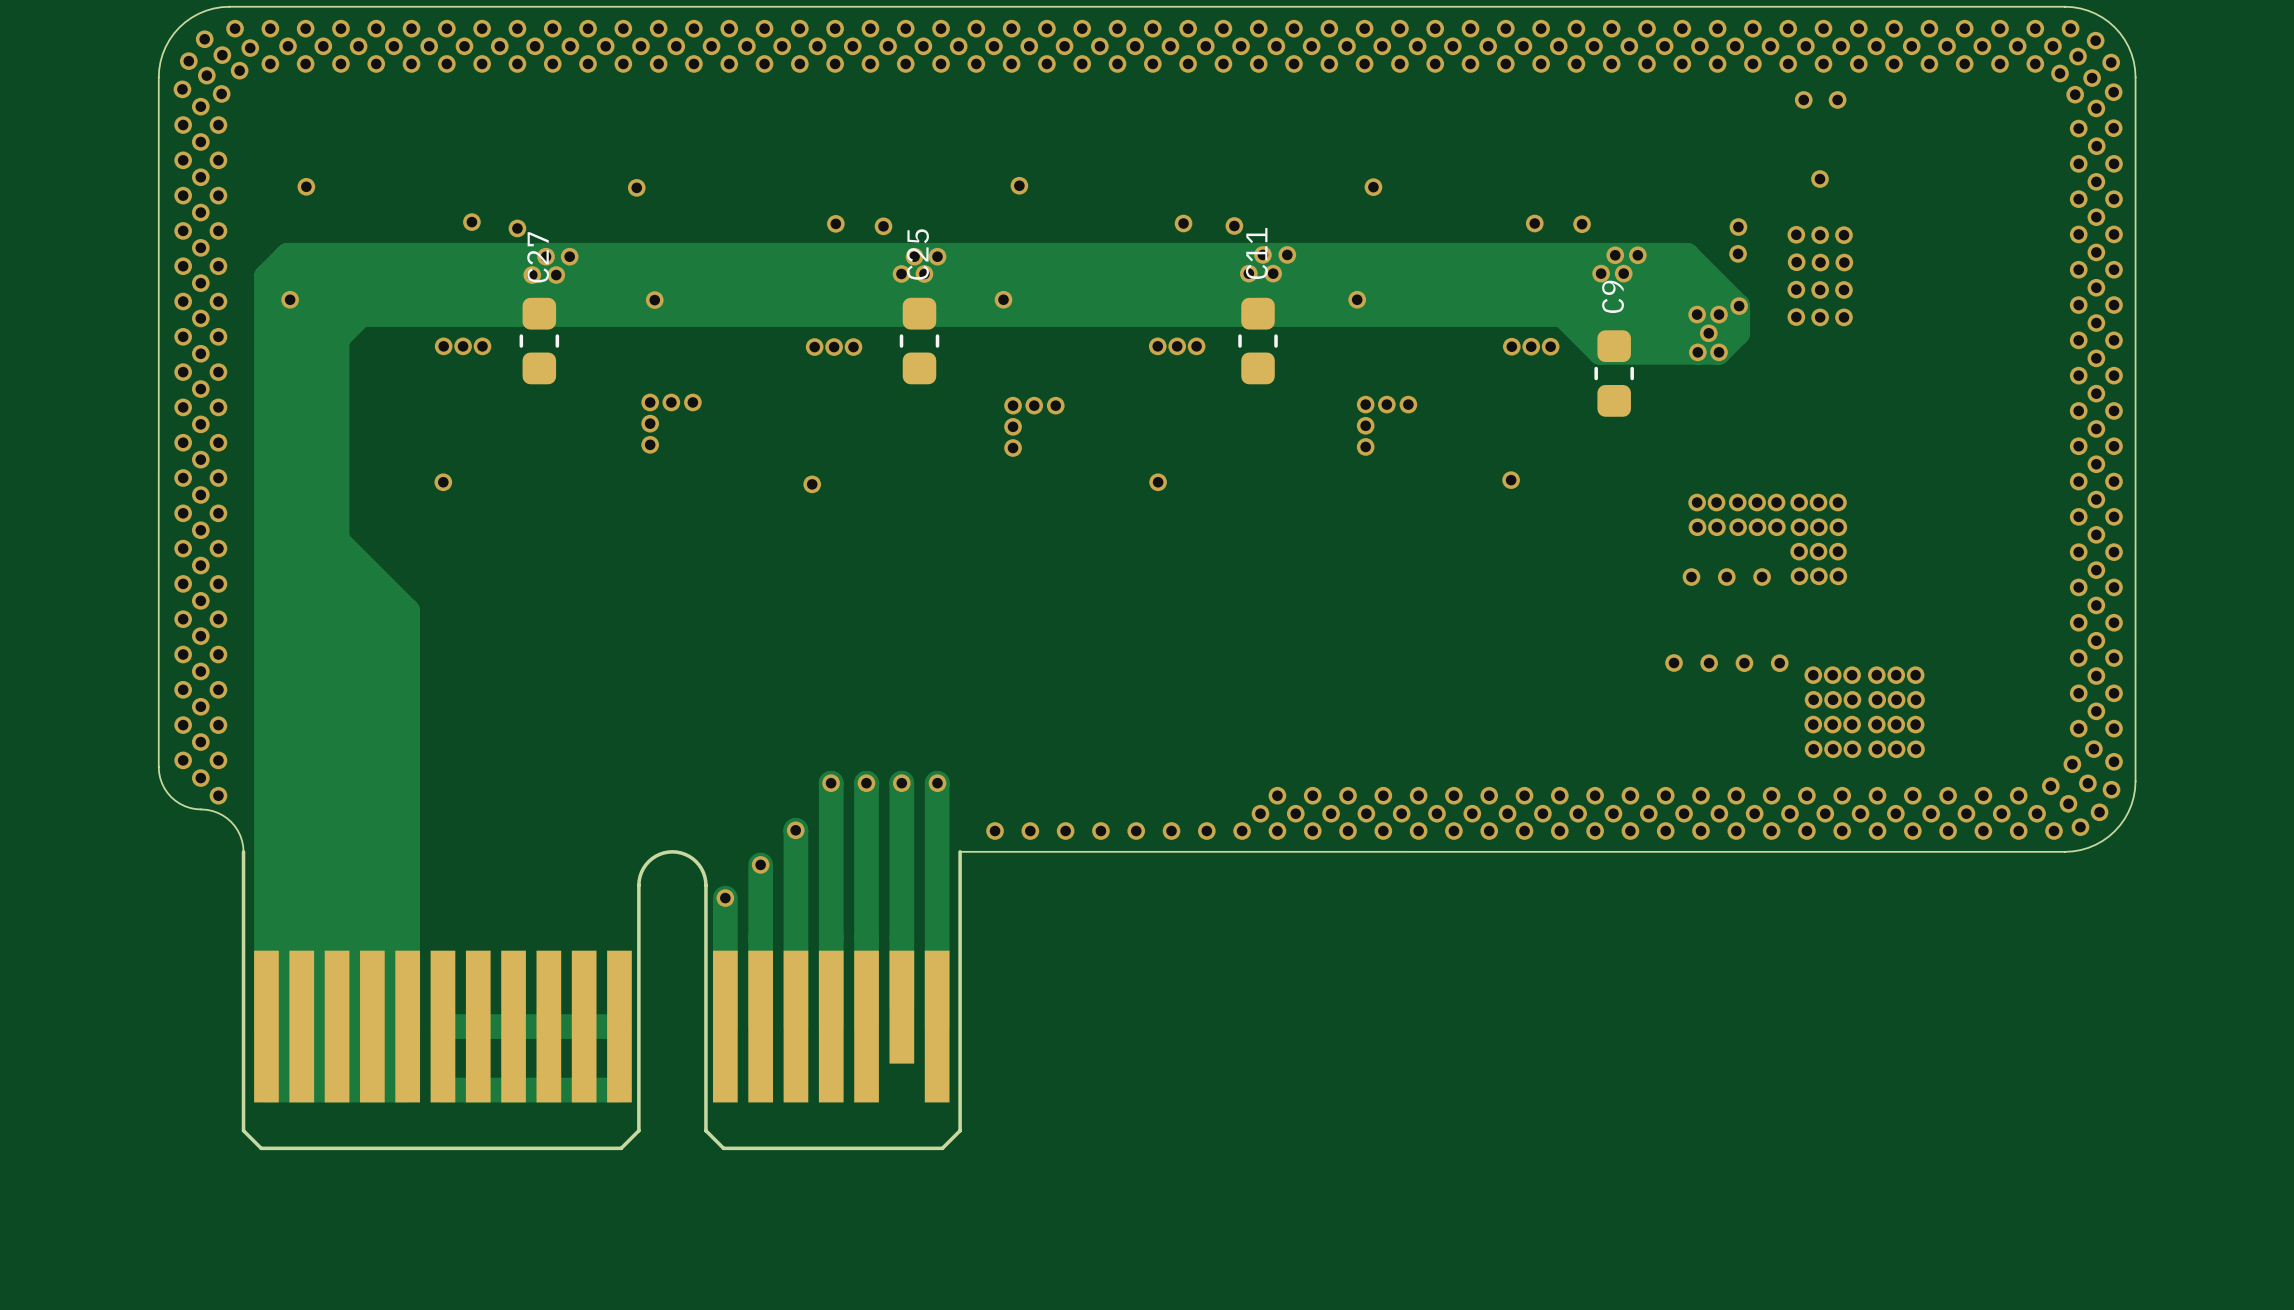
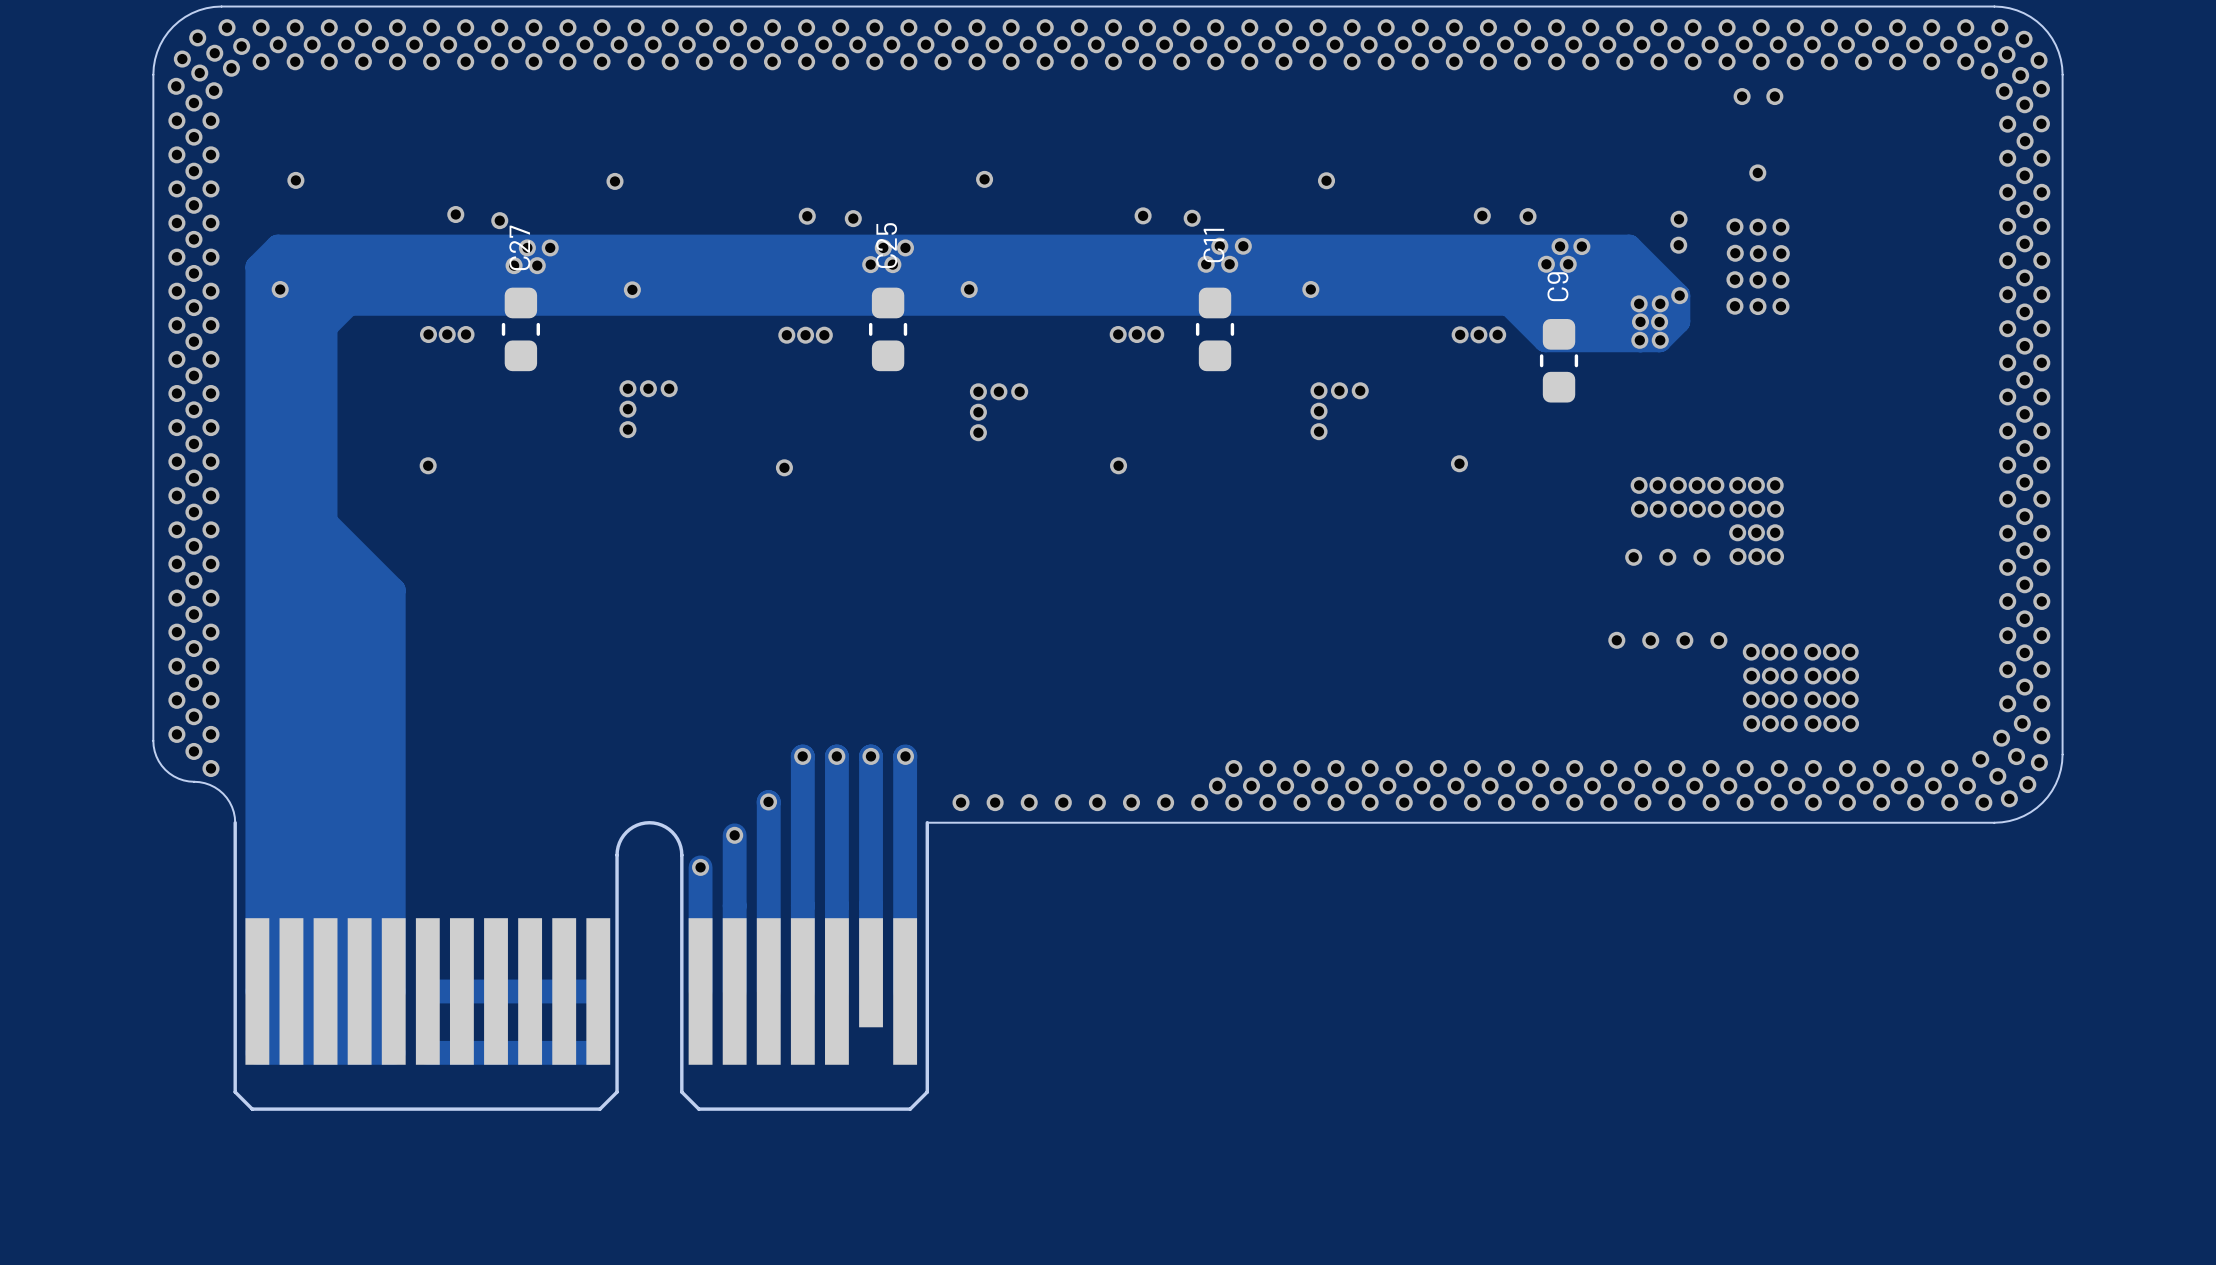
via: none -> (1640, 321)
via: (1708, 333) -> none
via: none -> (1659, 322)

